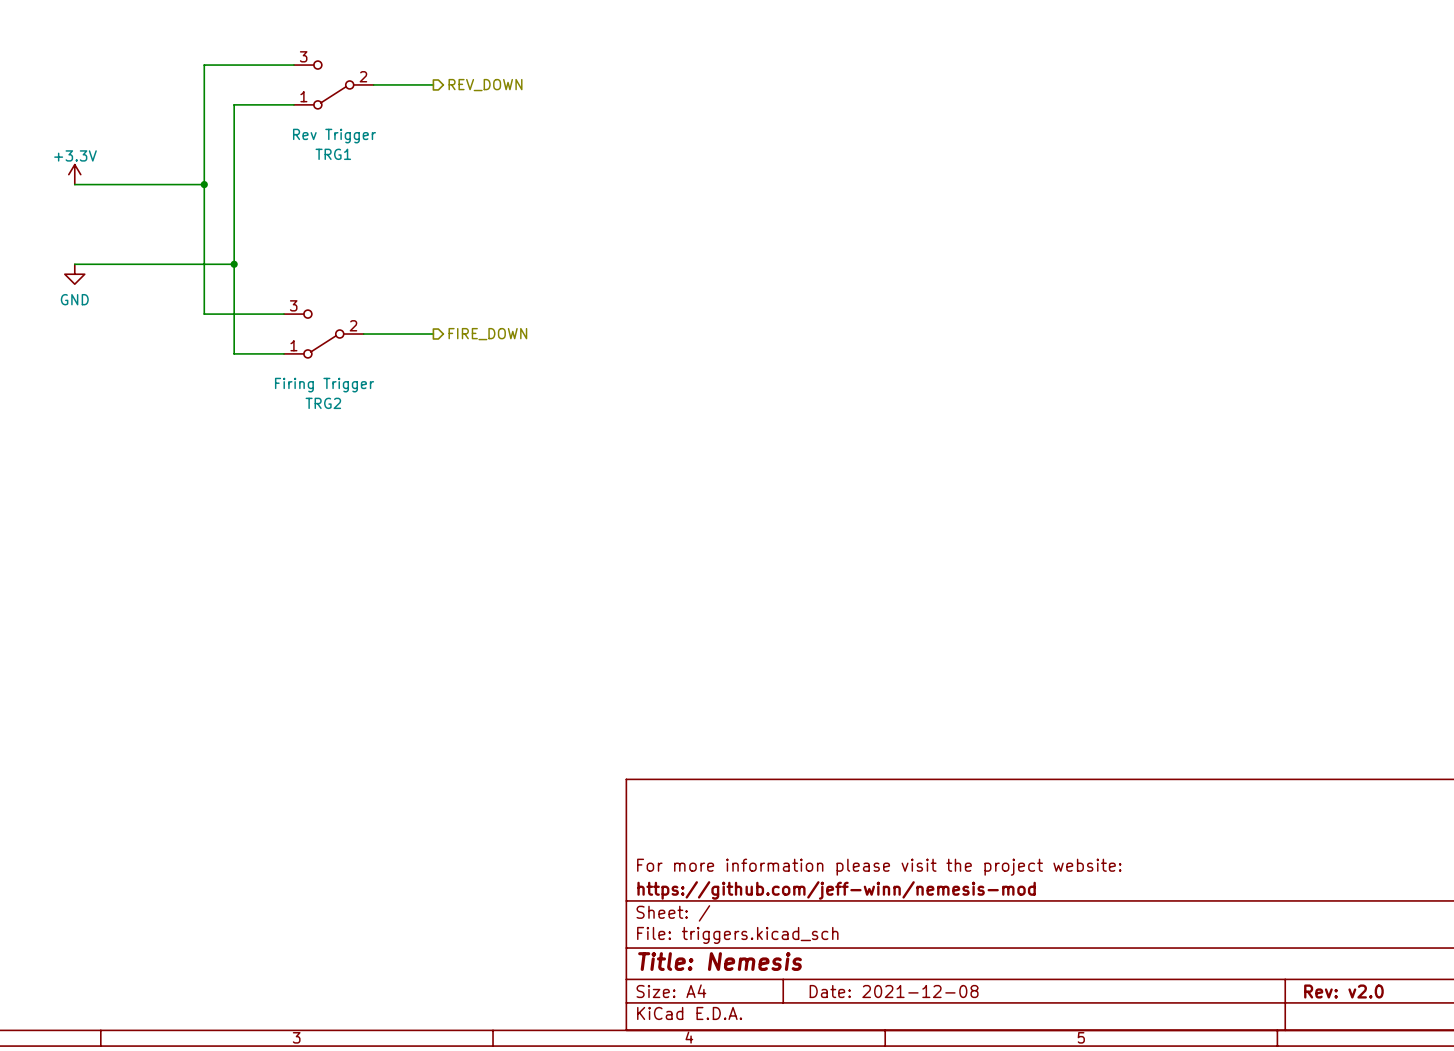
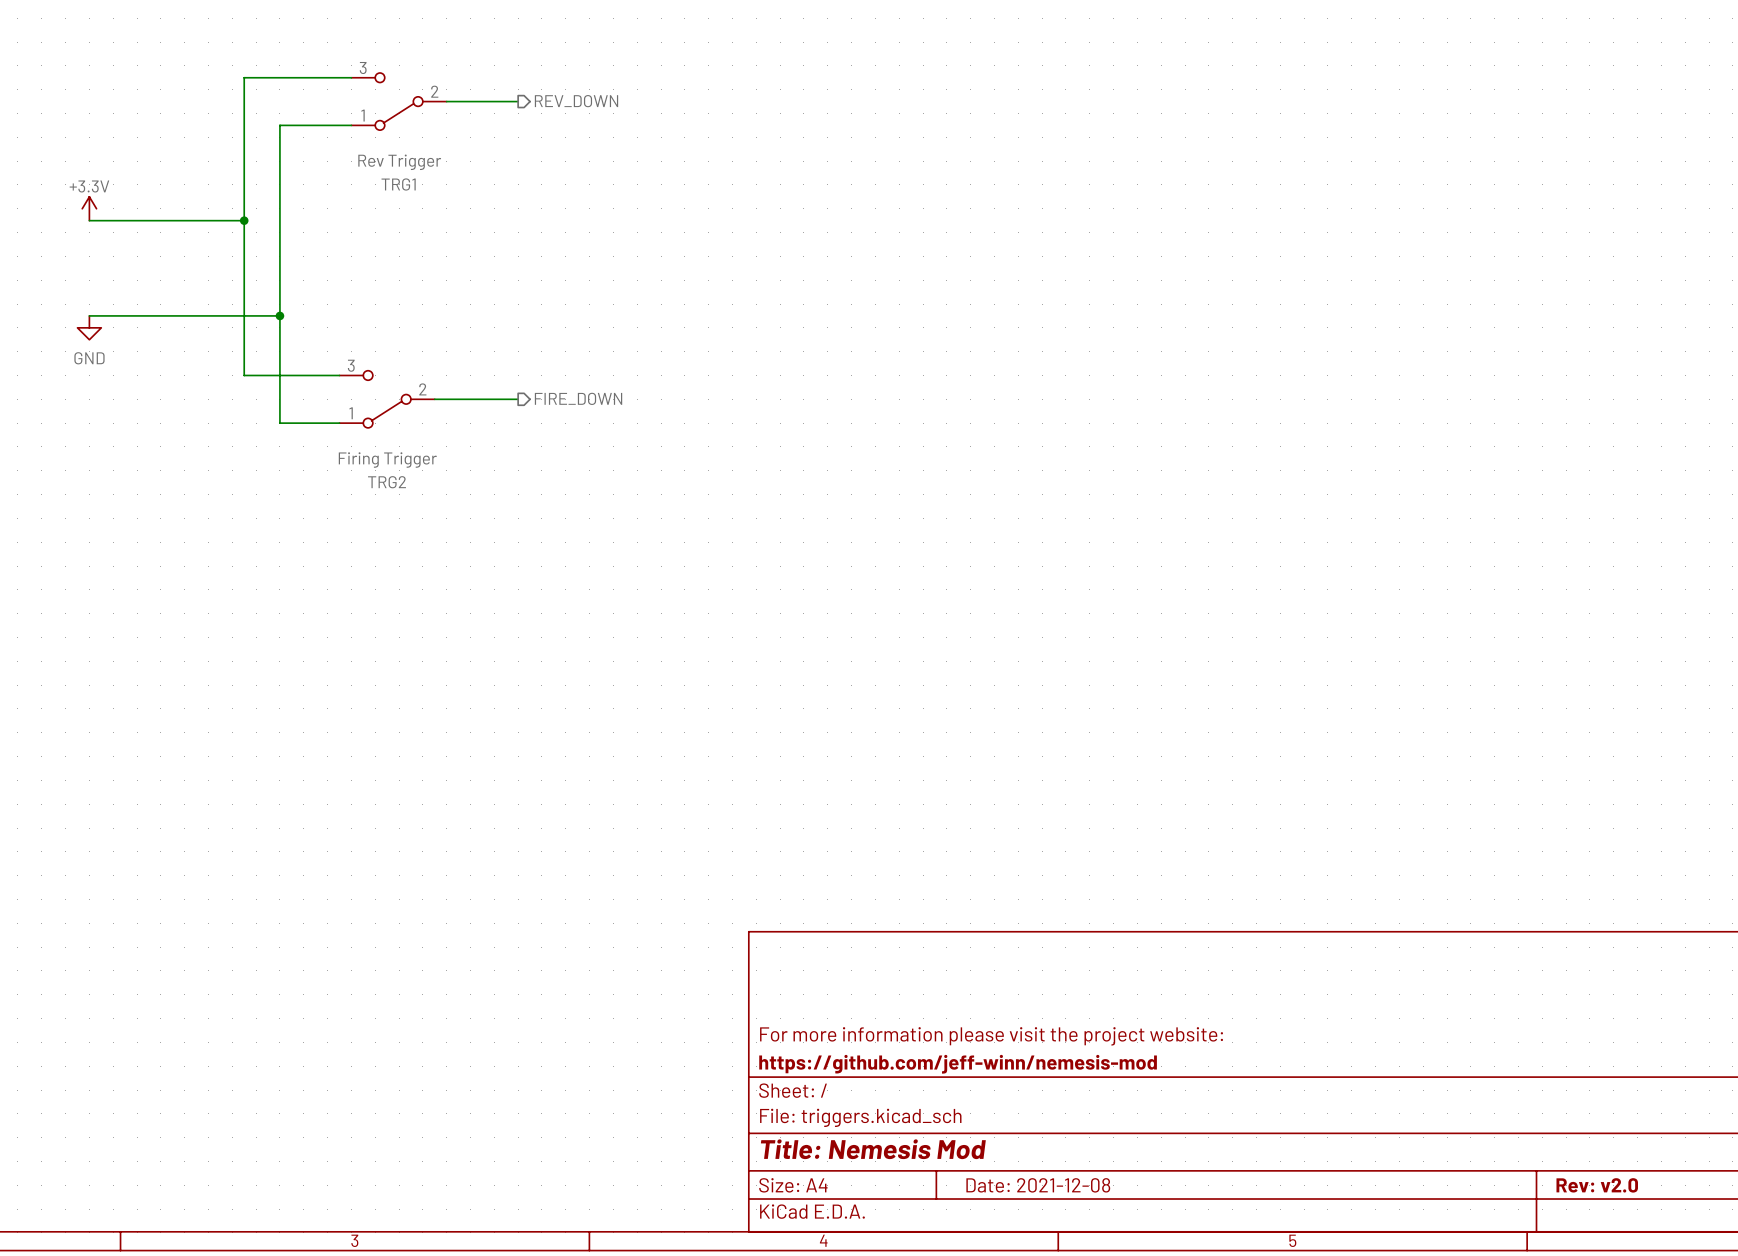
title block: Title: Nemesis (720, 961) -> Title: Nemesis Mod (873, 1149)

